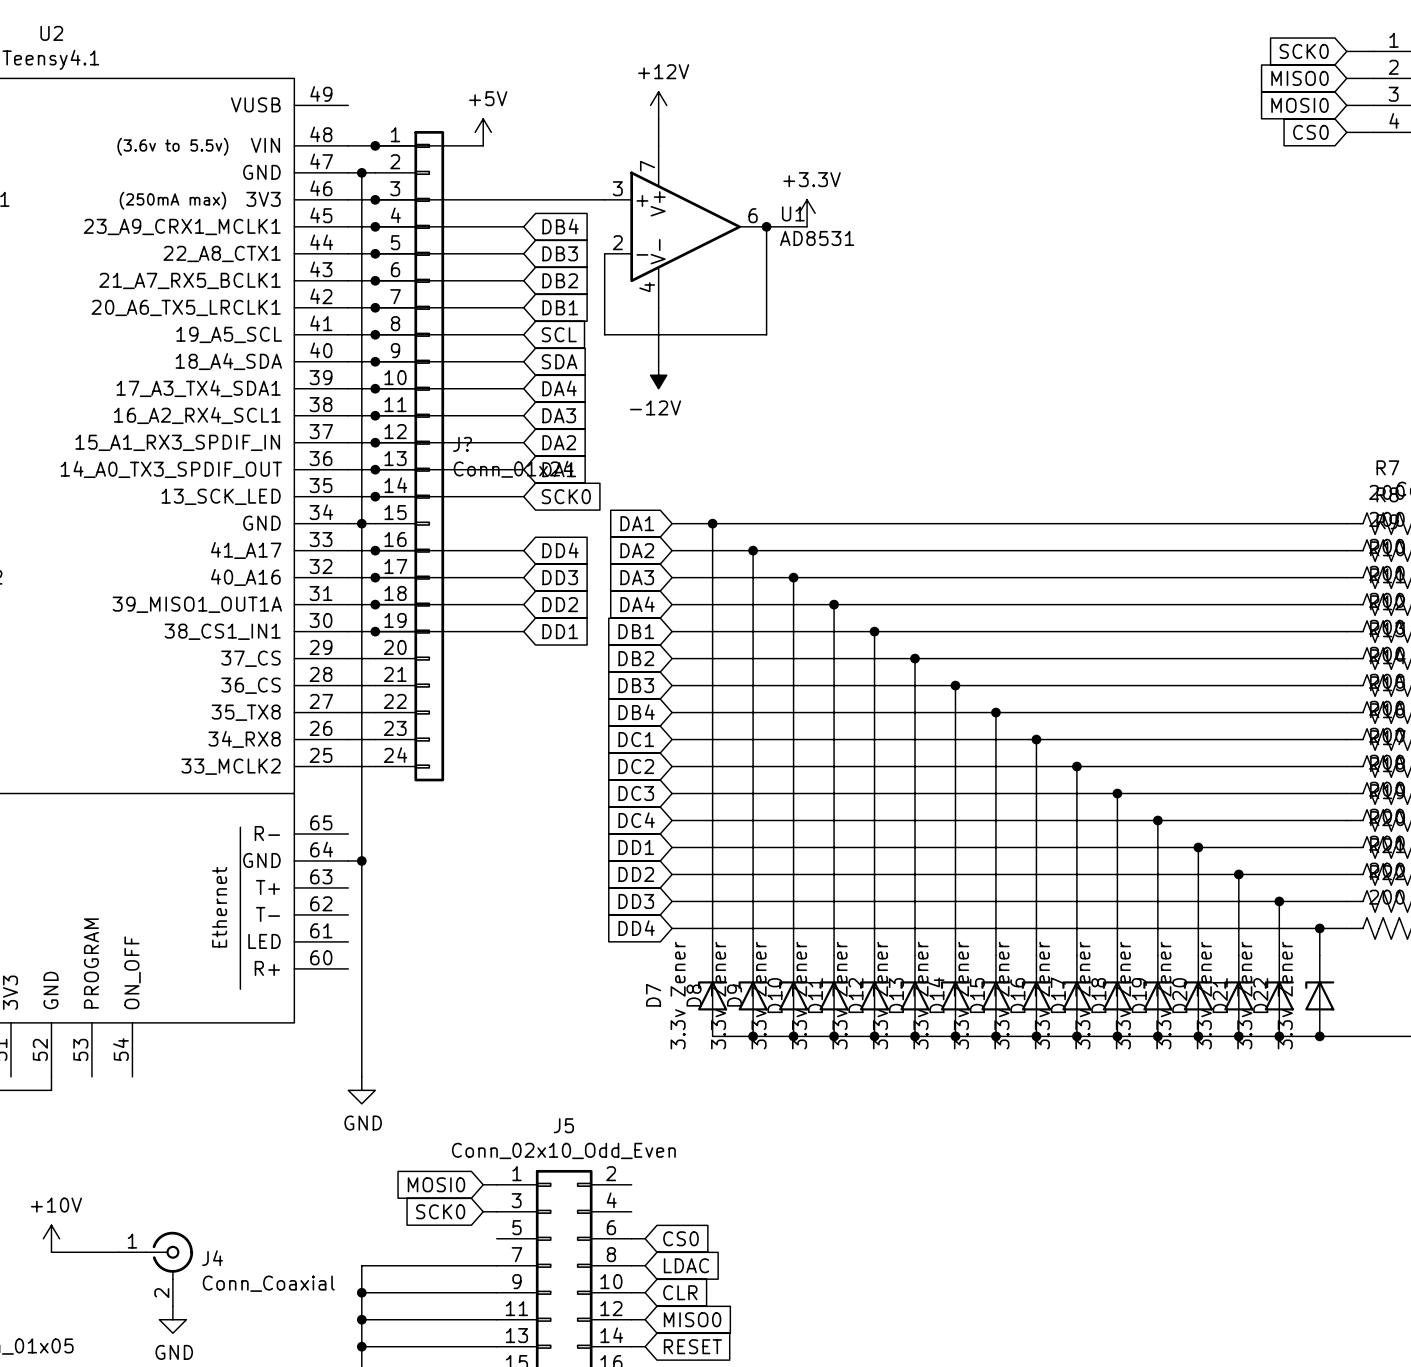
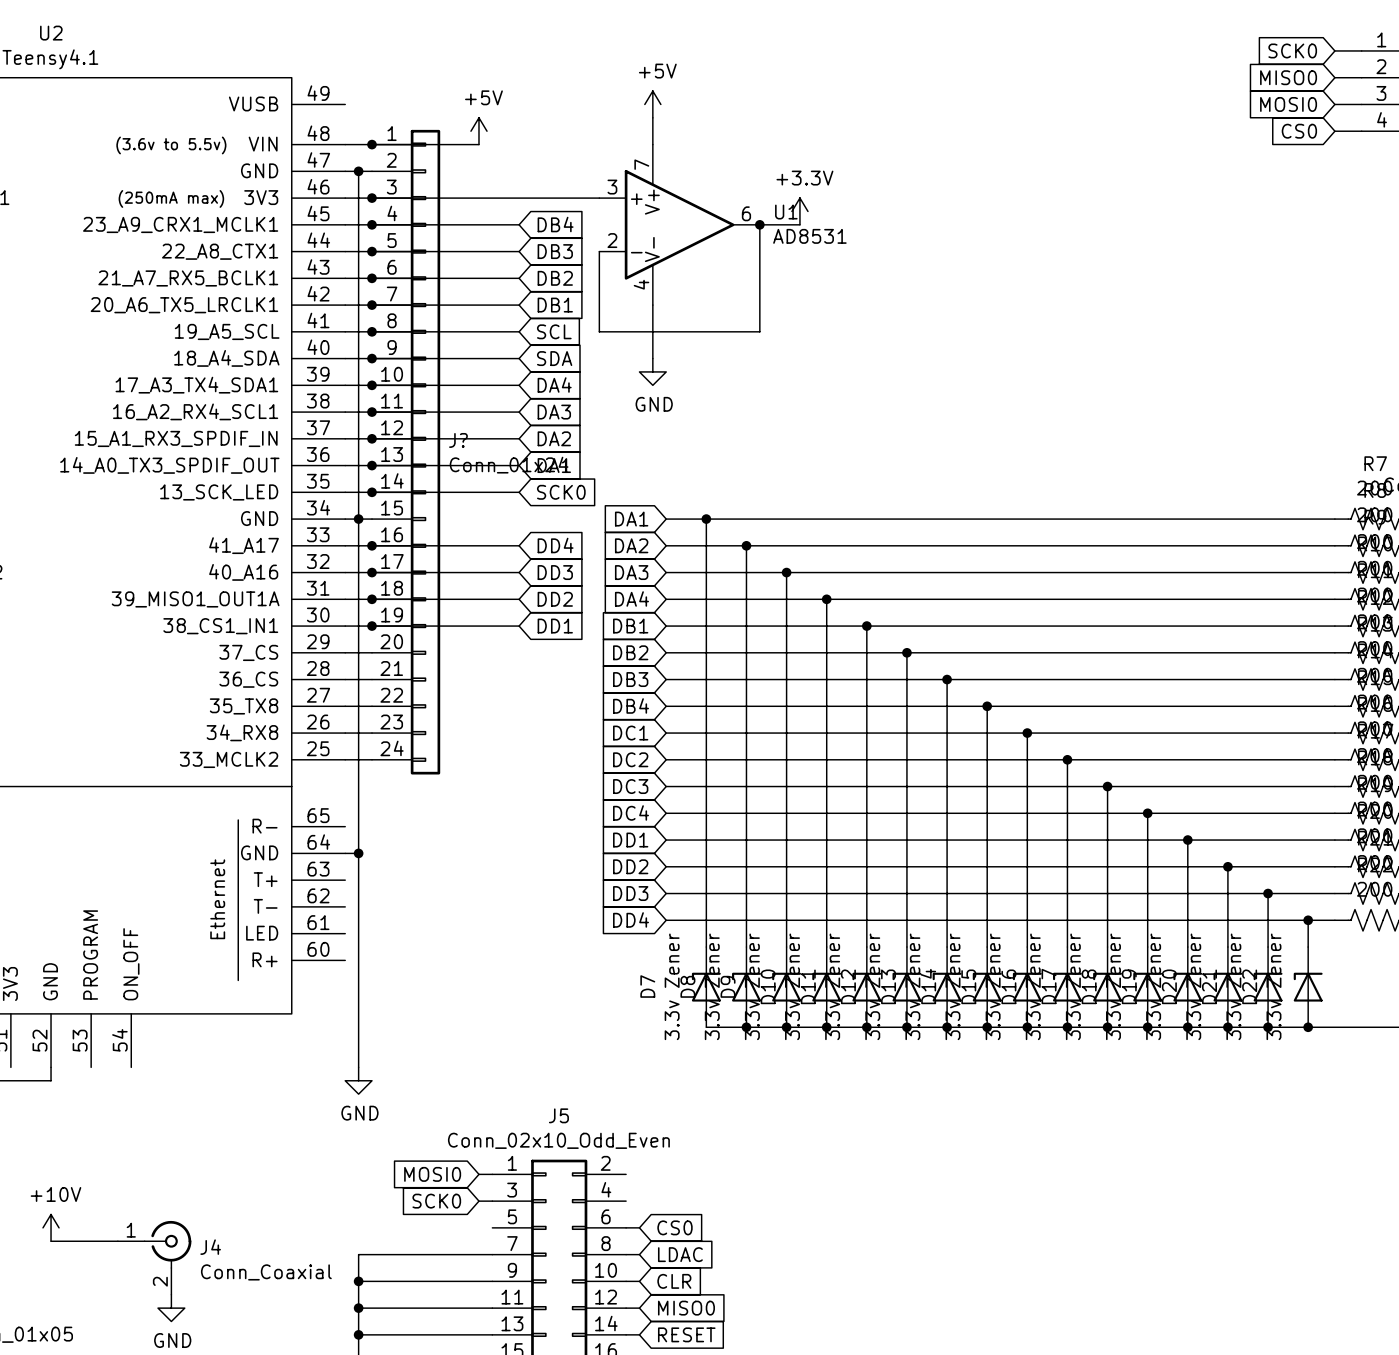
power symbol: +12V (658, 105) -> +5V (652, 104)
power symbol: -12V (658, 375) -> GND (652, 371)

